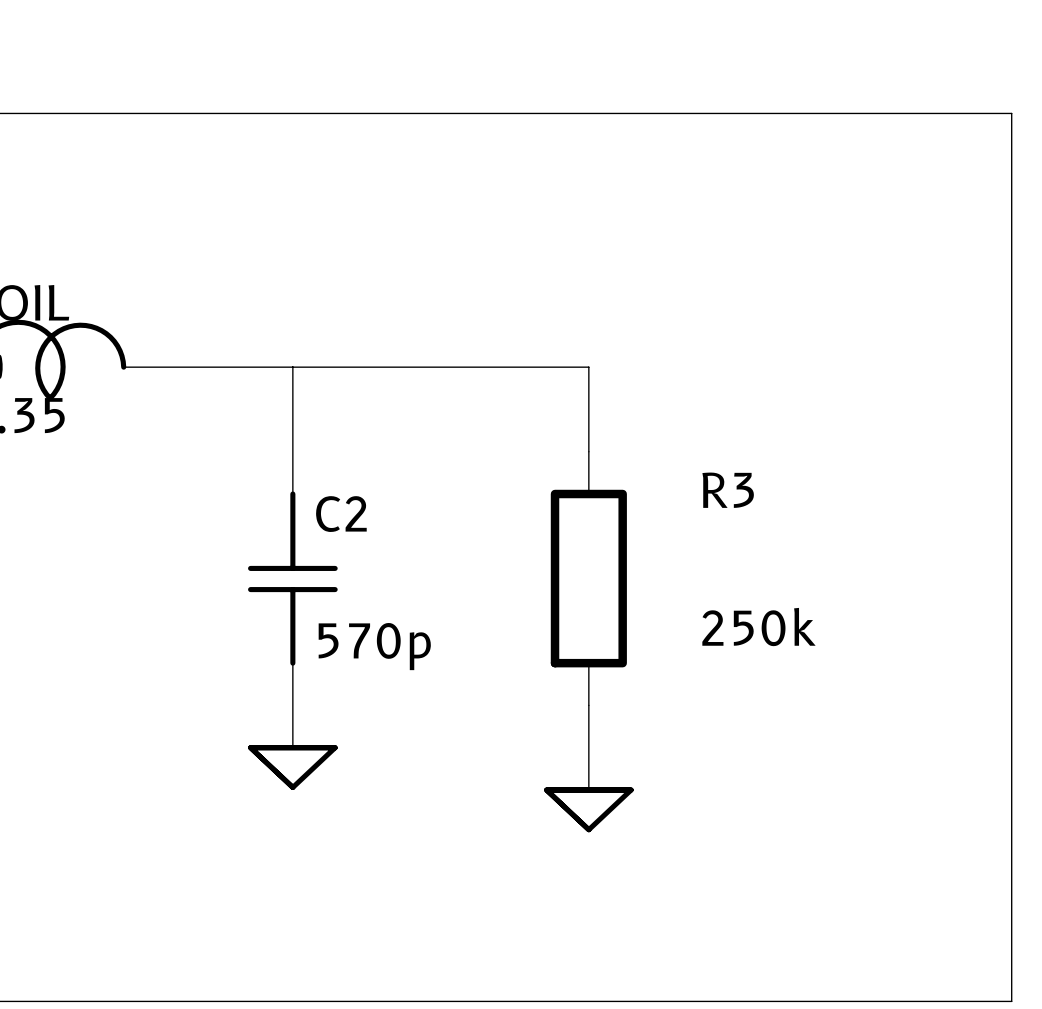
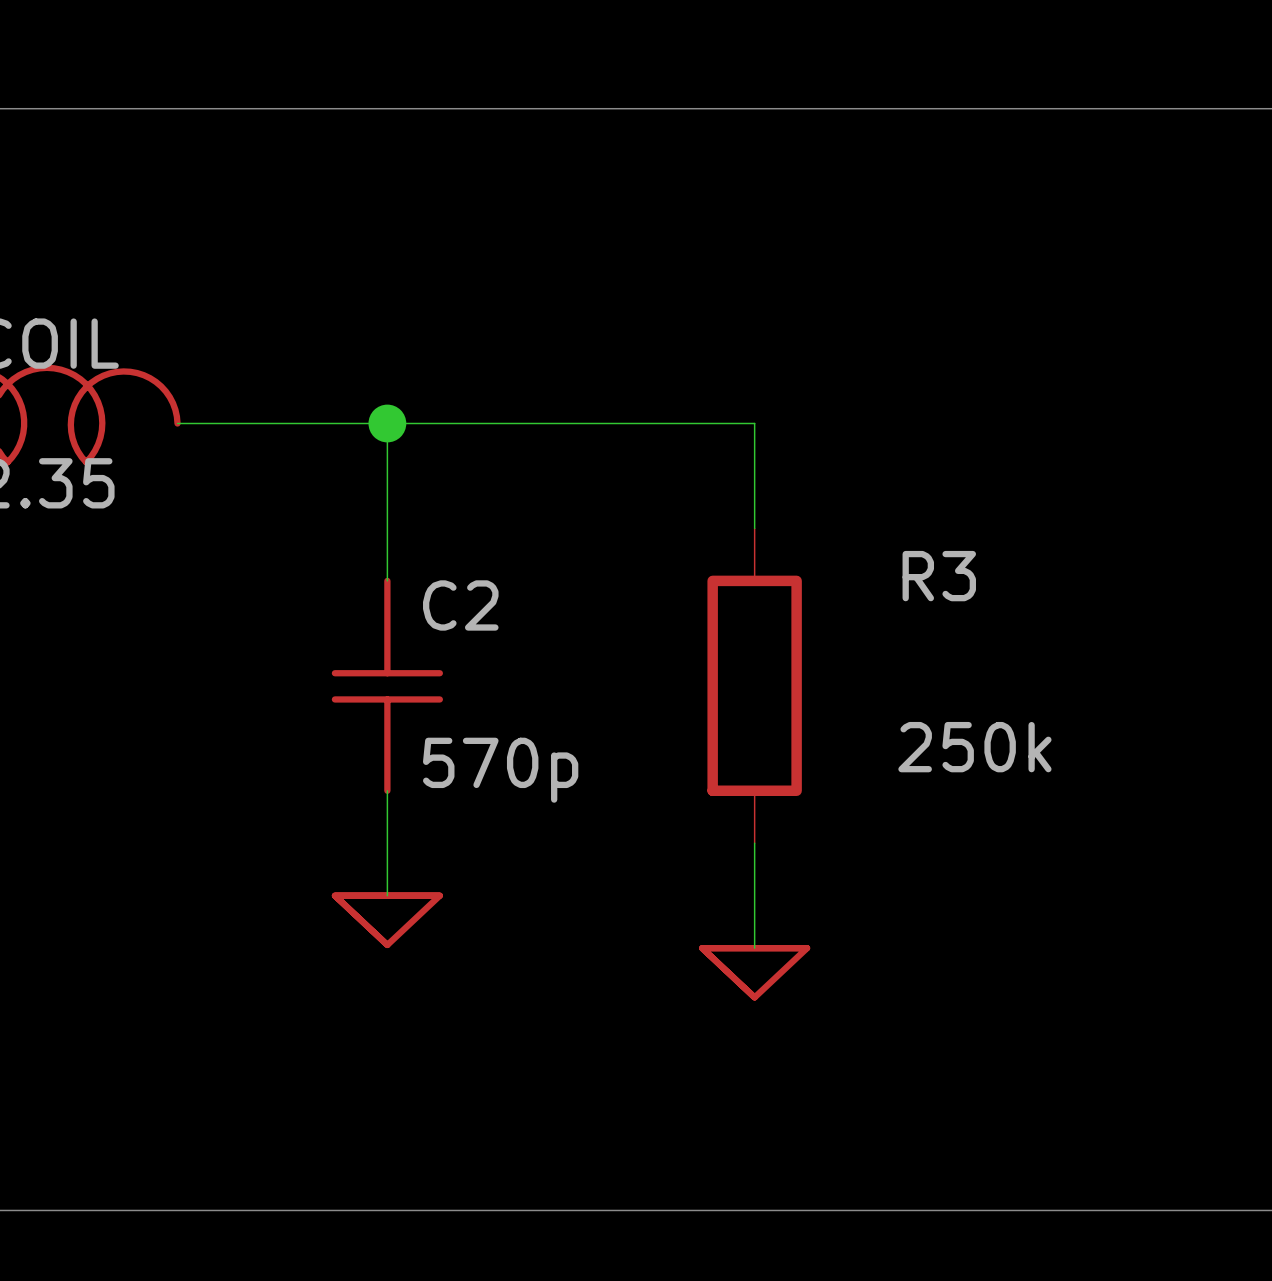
junction: none -> (387, 423)

